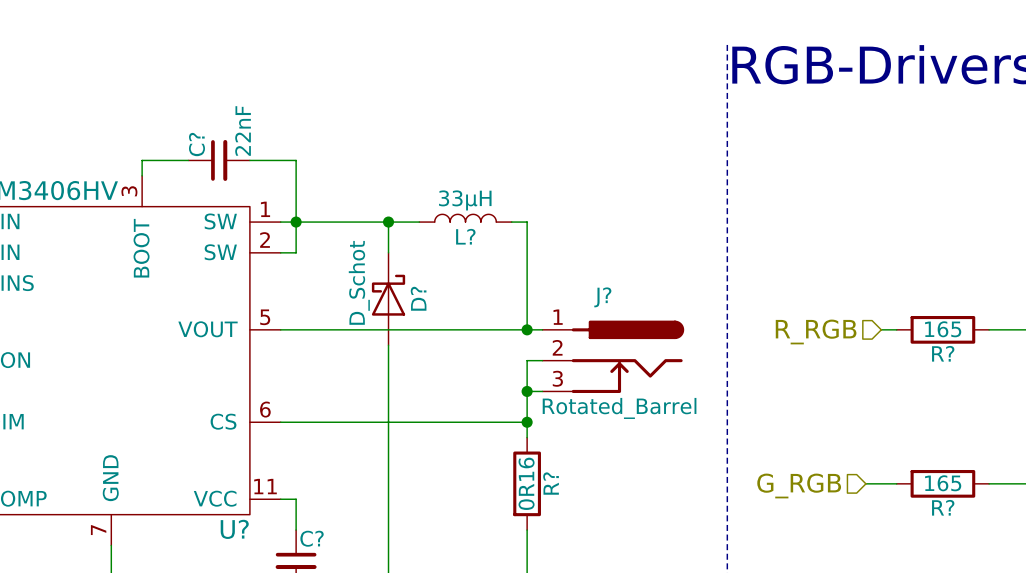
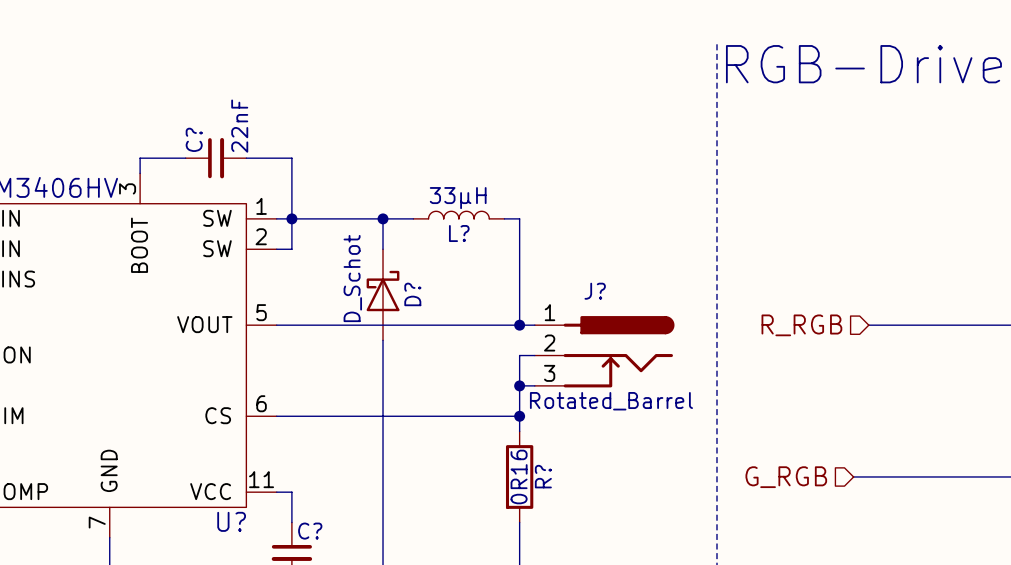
wire: none -> (883, 325) (975, 325)
R?: 165 (942, 329) -> none
wire: none -> (883, 476) (975, 476)
R?: 165 (942, 483) -> none

